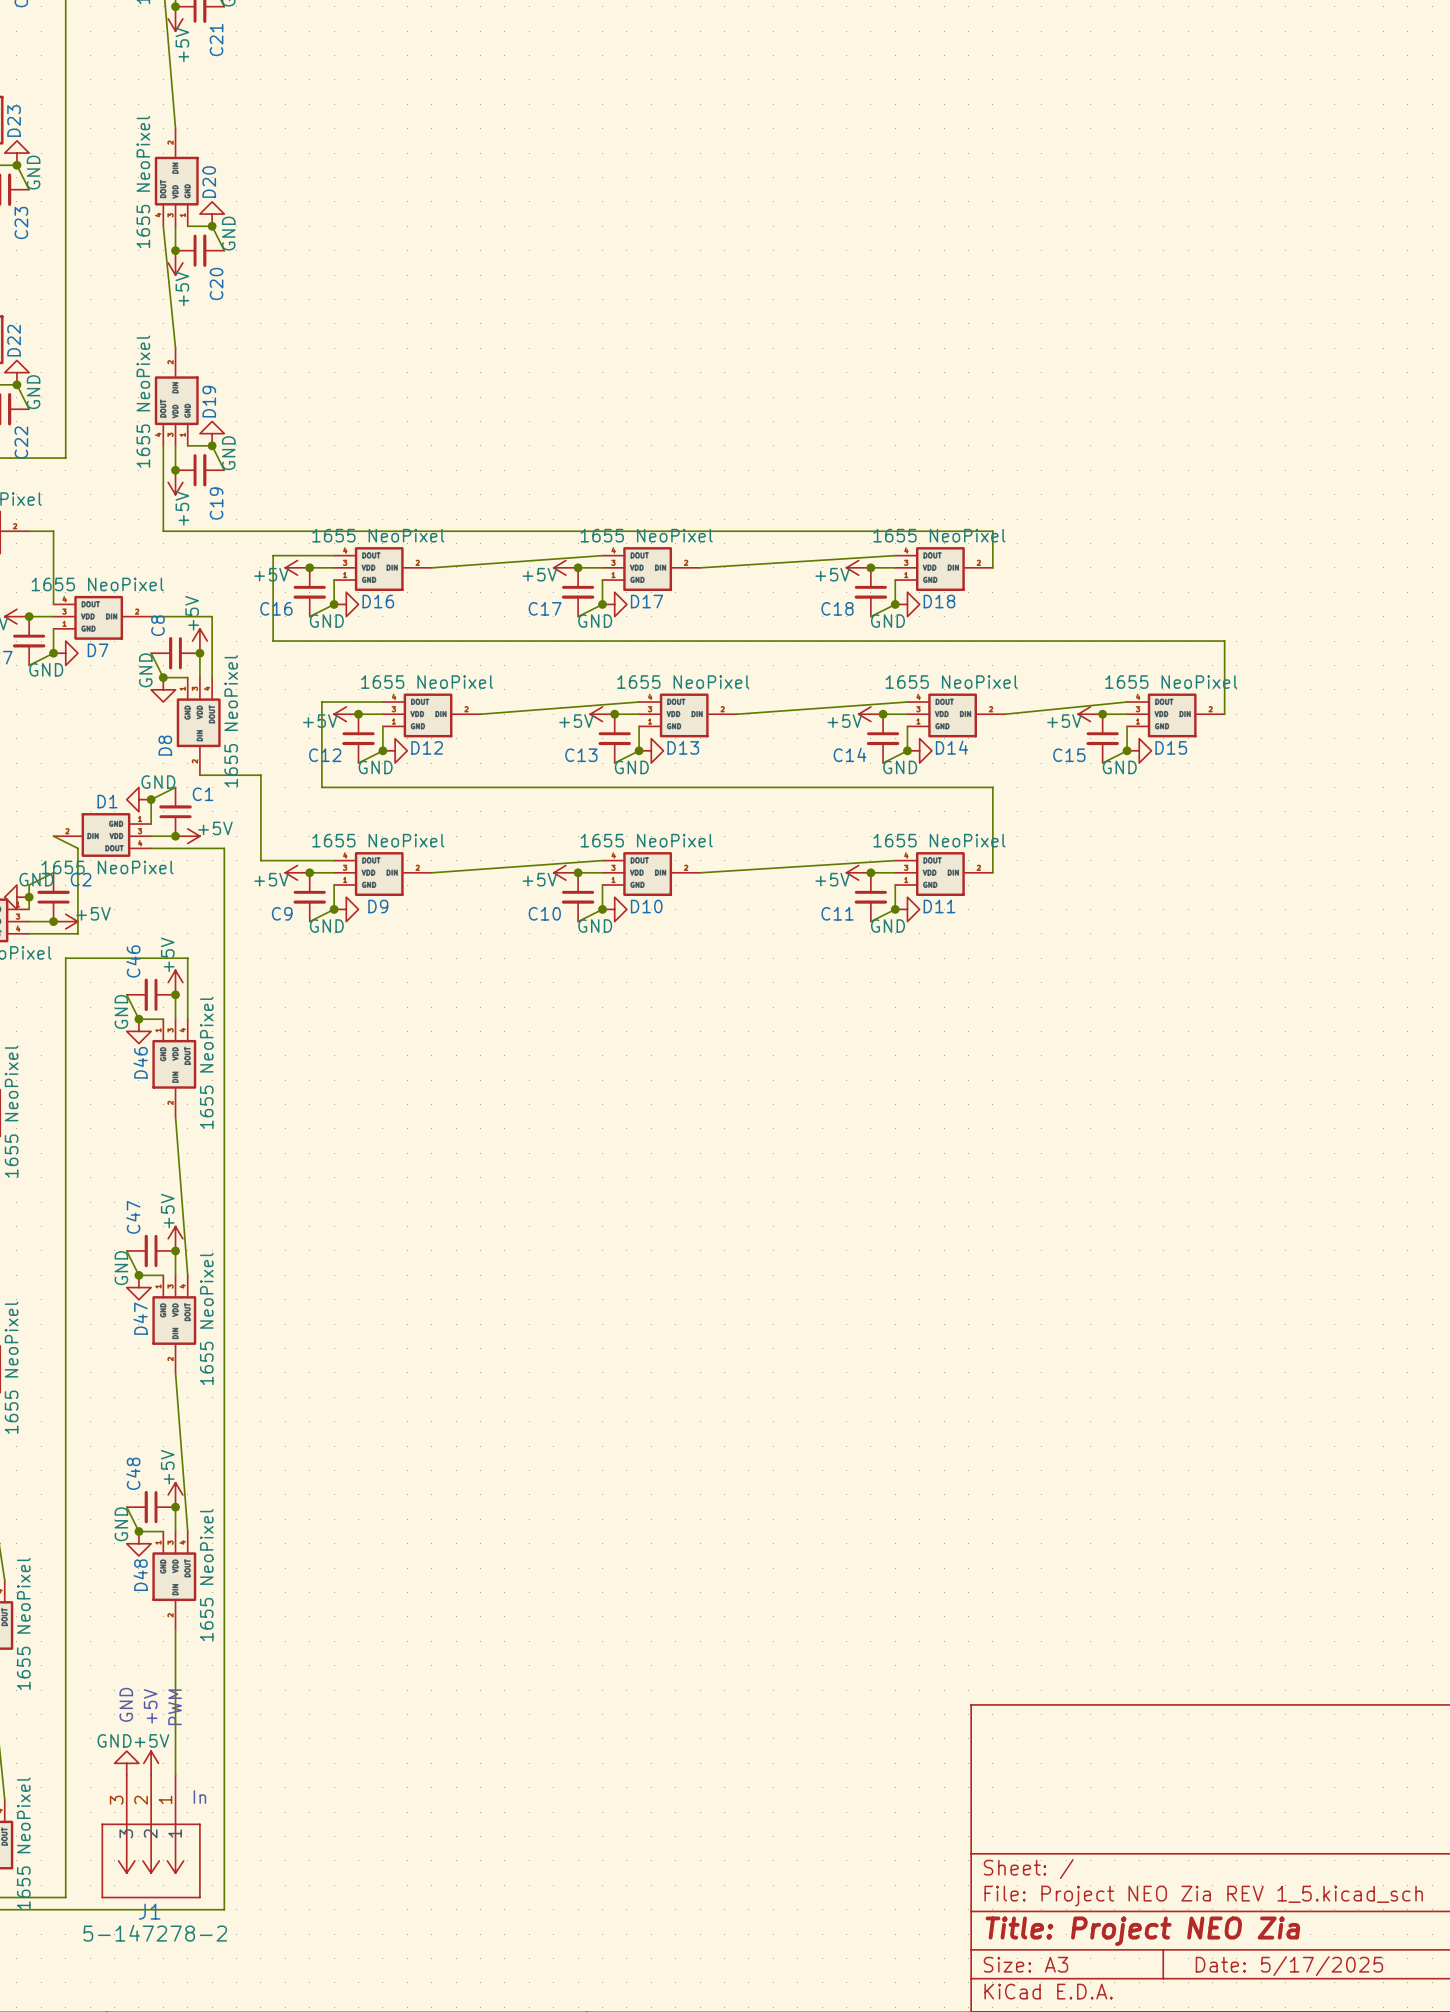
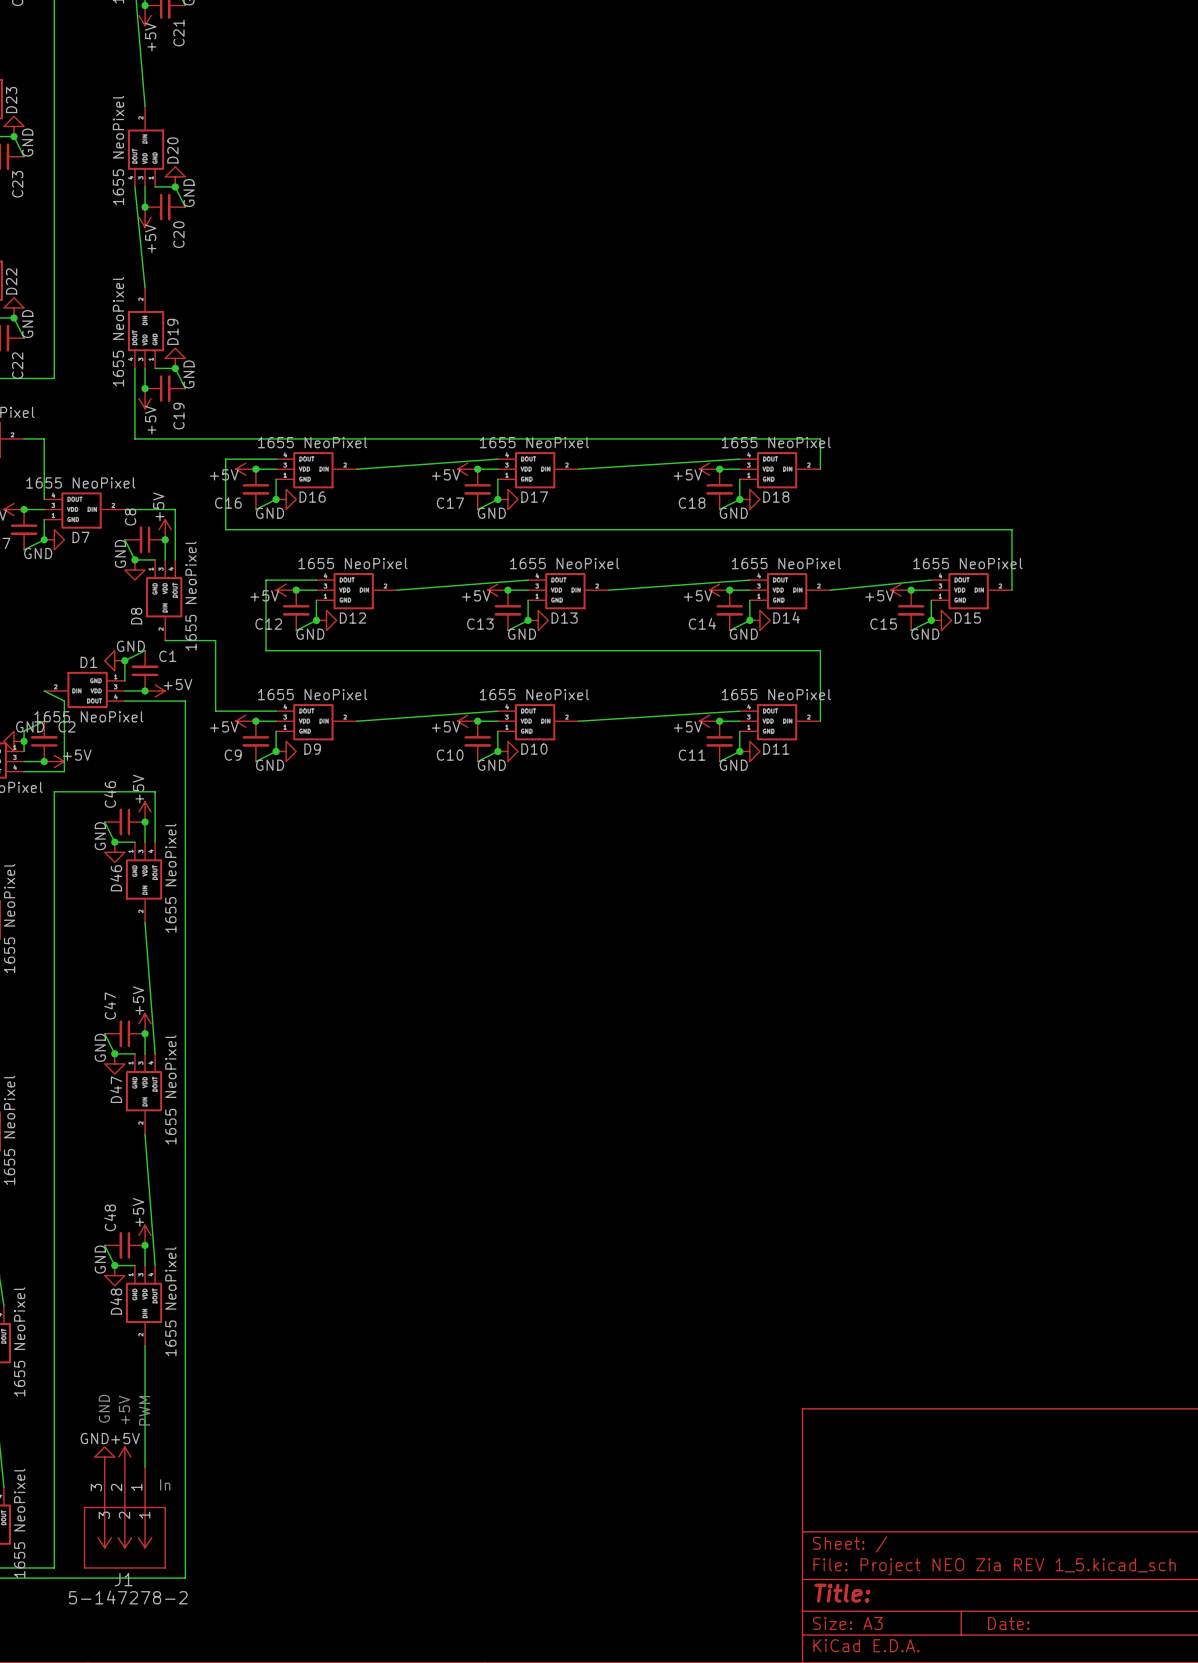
title block: Title: Project NEO Zia (1142, 1931) -> Title: (842, 1593)
title block: Date: 5/17/2025 (1289, 1966) -> Date: (1008, 1623)

